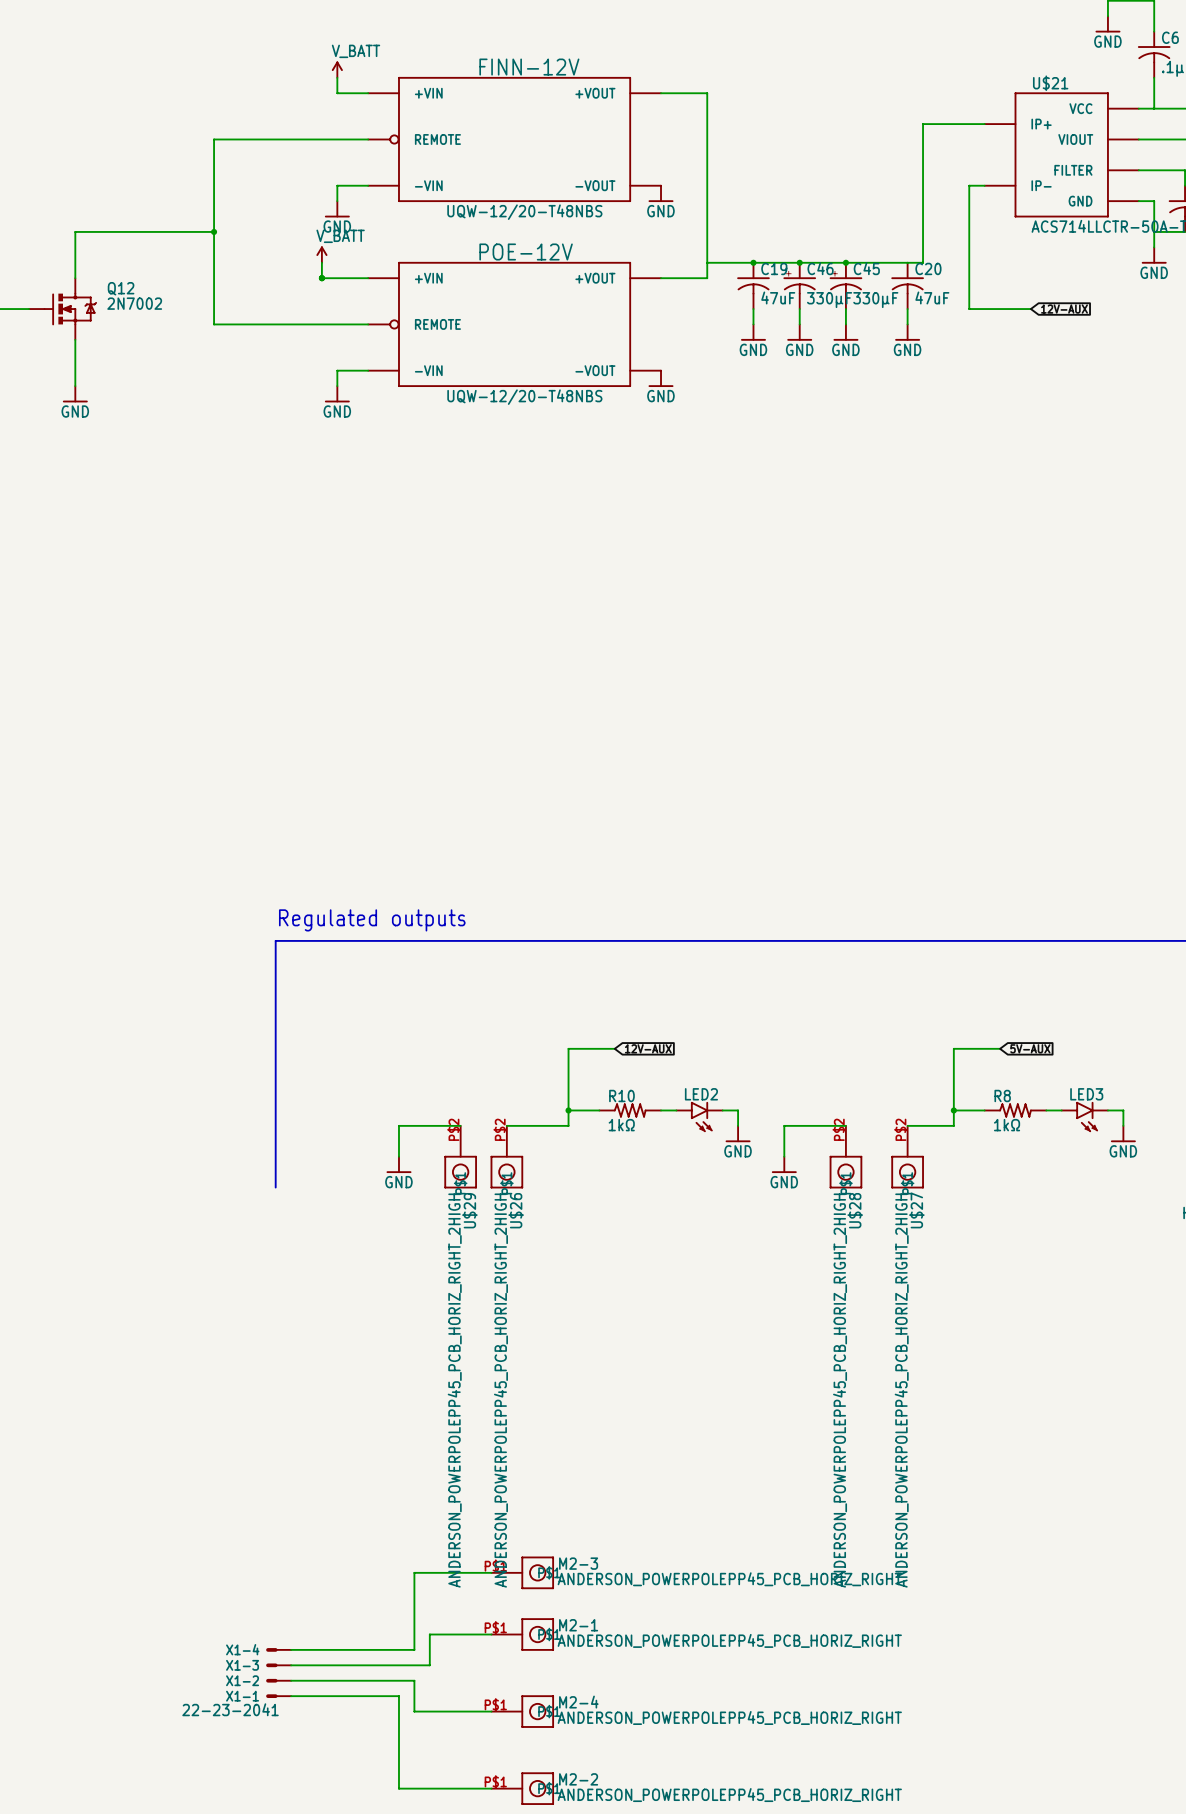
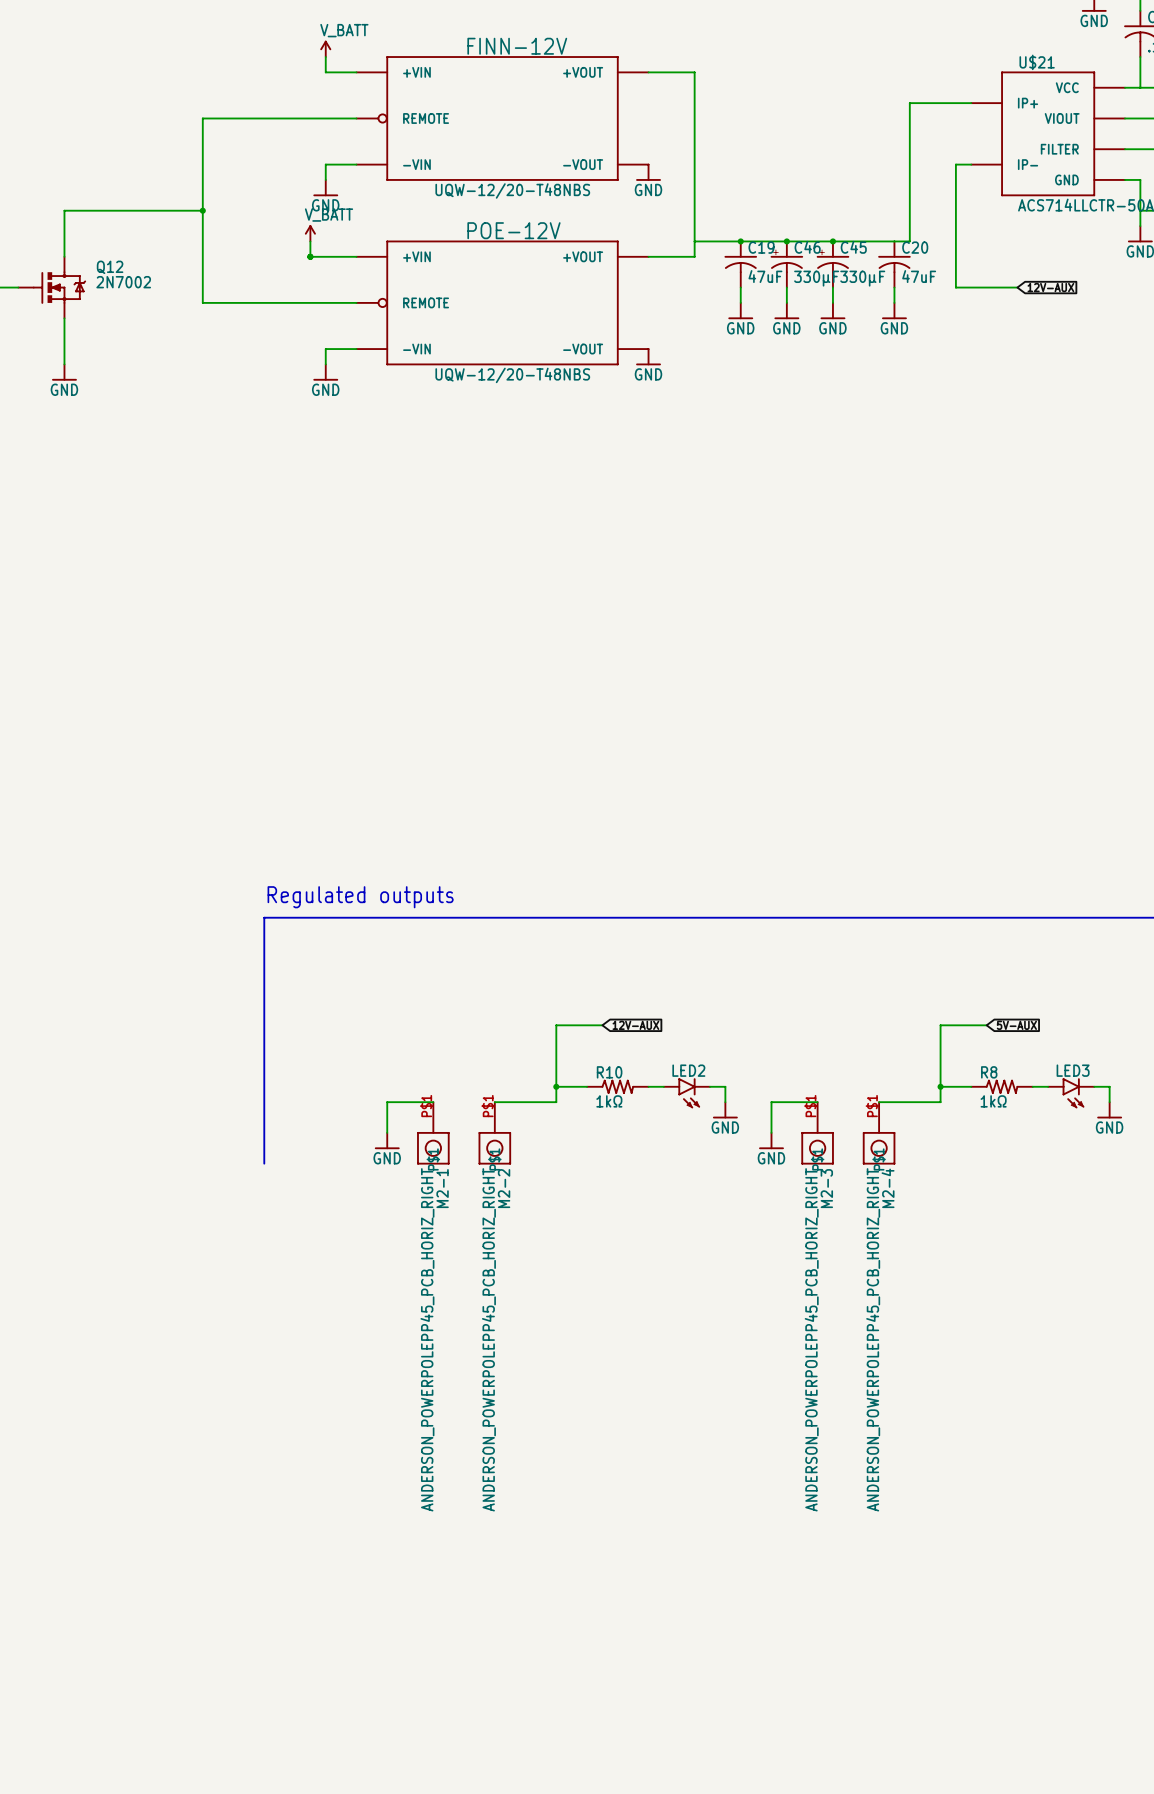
wire: (445, 1125) (460, 1125) -> none
wire: (830, 1125) (845, 1125) -> (879, 1102) (894, 1102)
U$29: ANDERSON_POWERPOLEPP45_PCB_HORIZ_RIGHT_2HIGH (460, 1157) -> none
U$26: ANDERSON_POWERPOLEPP45_PCB_HORIZ_RIGHT_2HIGH (506, 1157) -> none
U$28: ANDERSON_POWERPOLEPP45_PCB_HORIZ_RIGHT_2HIGH (845, 1157) -> none
U$27: ANDERSON_POWERPOLEPP45_PCB_HORIZ_RIGHT_2HIGH (907, 1157) -> none
wire: (491, 1572) (414, 1572) (414, 1649) (291, 1649) -> none
M2-3 position: (522, 1572) -> (817, 1133)
M2-3 rotation: 0° (537, 1572) -> 90° clockwise (817, 1148)
wire: (491, 1634) (429, 1634) (429, 1665) (291, 1665) -> none
M2-1 position: (522, 1634) -> (433, 1133)
M2-1 rotation: 0° (537, 1634) -> 90° clockwise (433, 1148)
X1-4: (278, 1649) -> none
X1-3: (278, 1665) -> none
X1-2: (278, 1680) -> none
wire: (291, 1680) (414, 1680) (414, 1711) (491, 1711) -> none
X1-1: 22-23-2041 (278, 1696) -> none
wire: (291, 1696) (398, 1696) (398, 1788) (491, 1788) -> none
M2-4 position: (522, 1711) -> (879, 1133)
M2-4 rotation: 0° (537, 1711) -> 90° clockwise (879, 1148)
M2-2 position: (522, 1788) -> (494, 1133)
M2-2 rotation: 0° (537, 1788) -> 90° clockwise (494, 1148)

